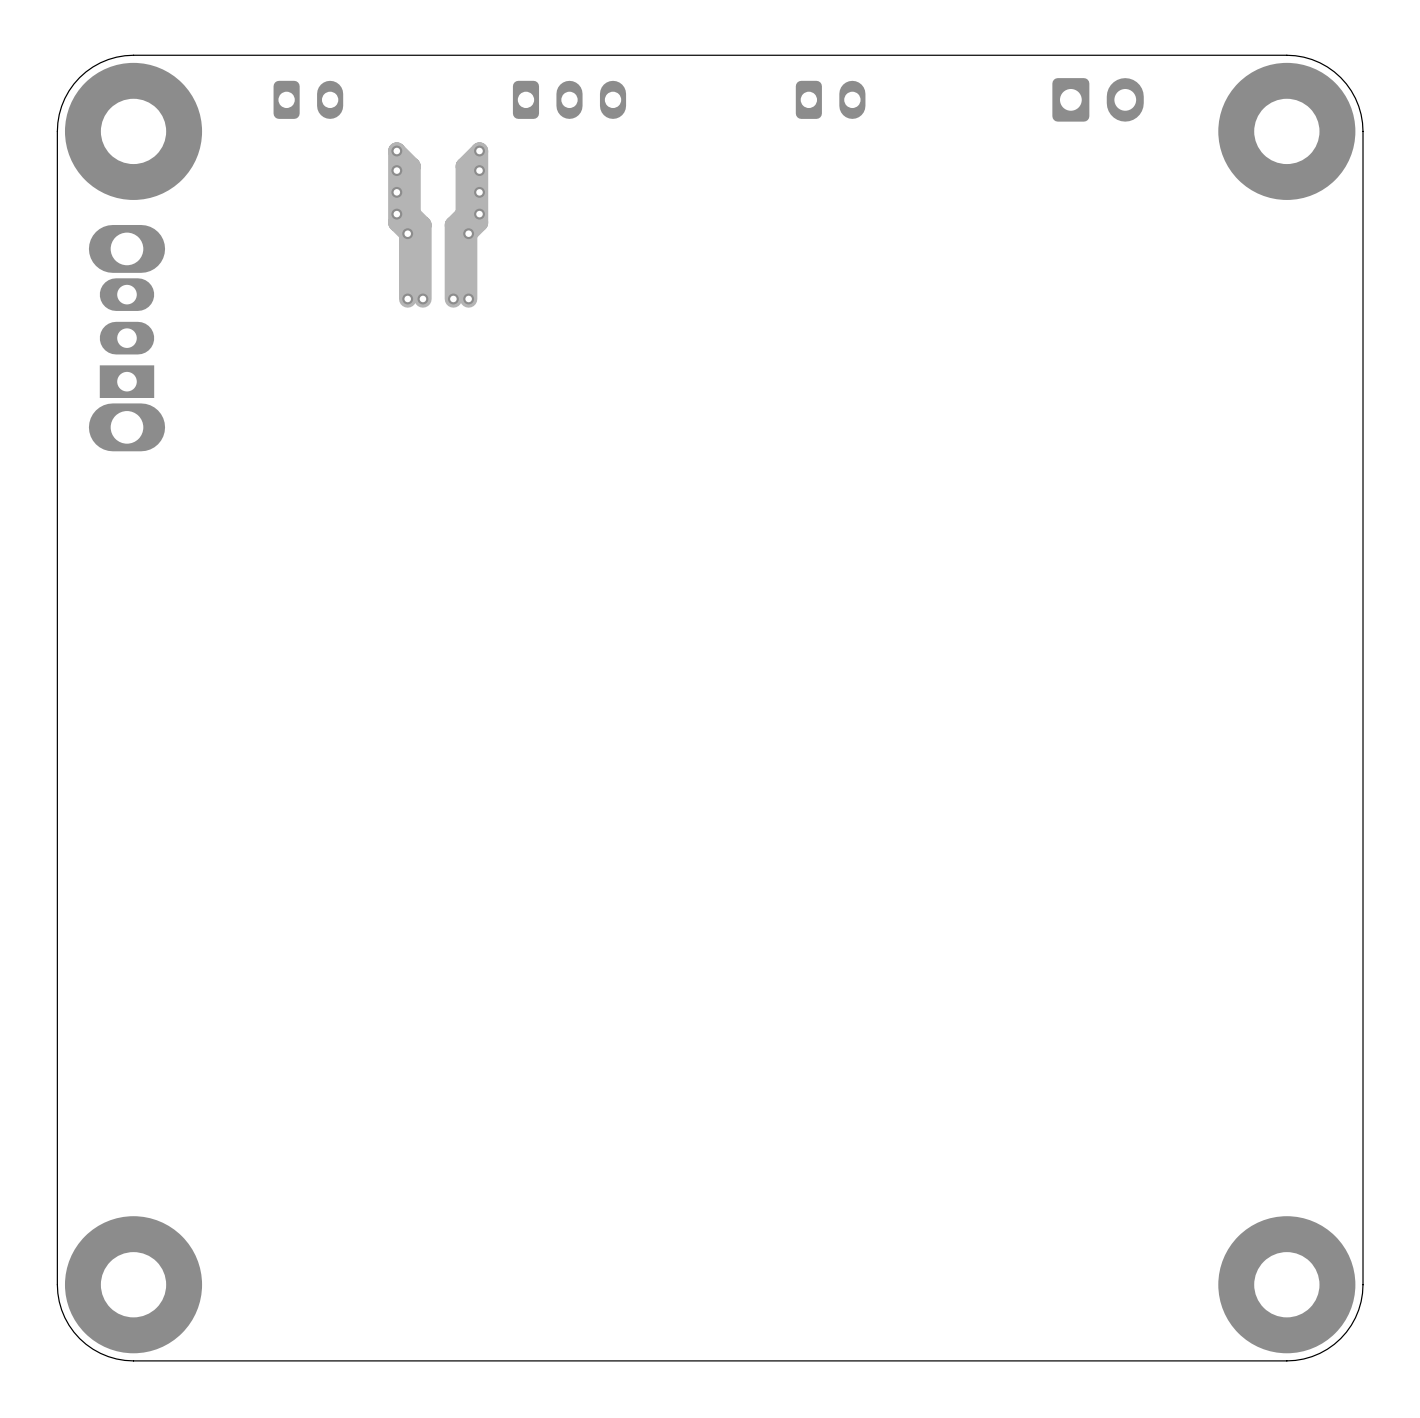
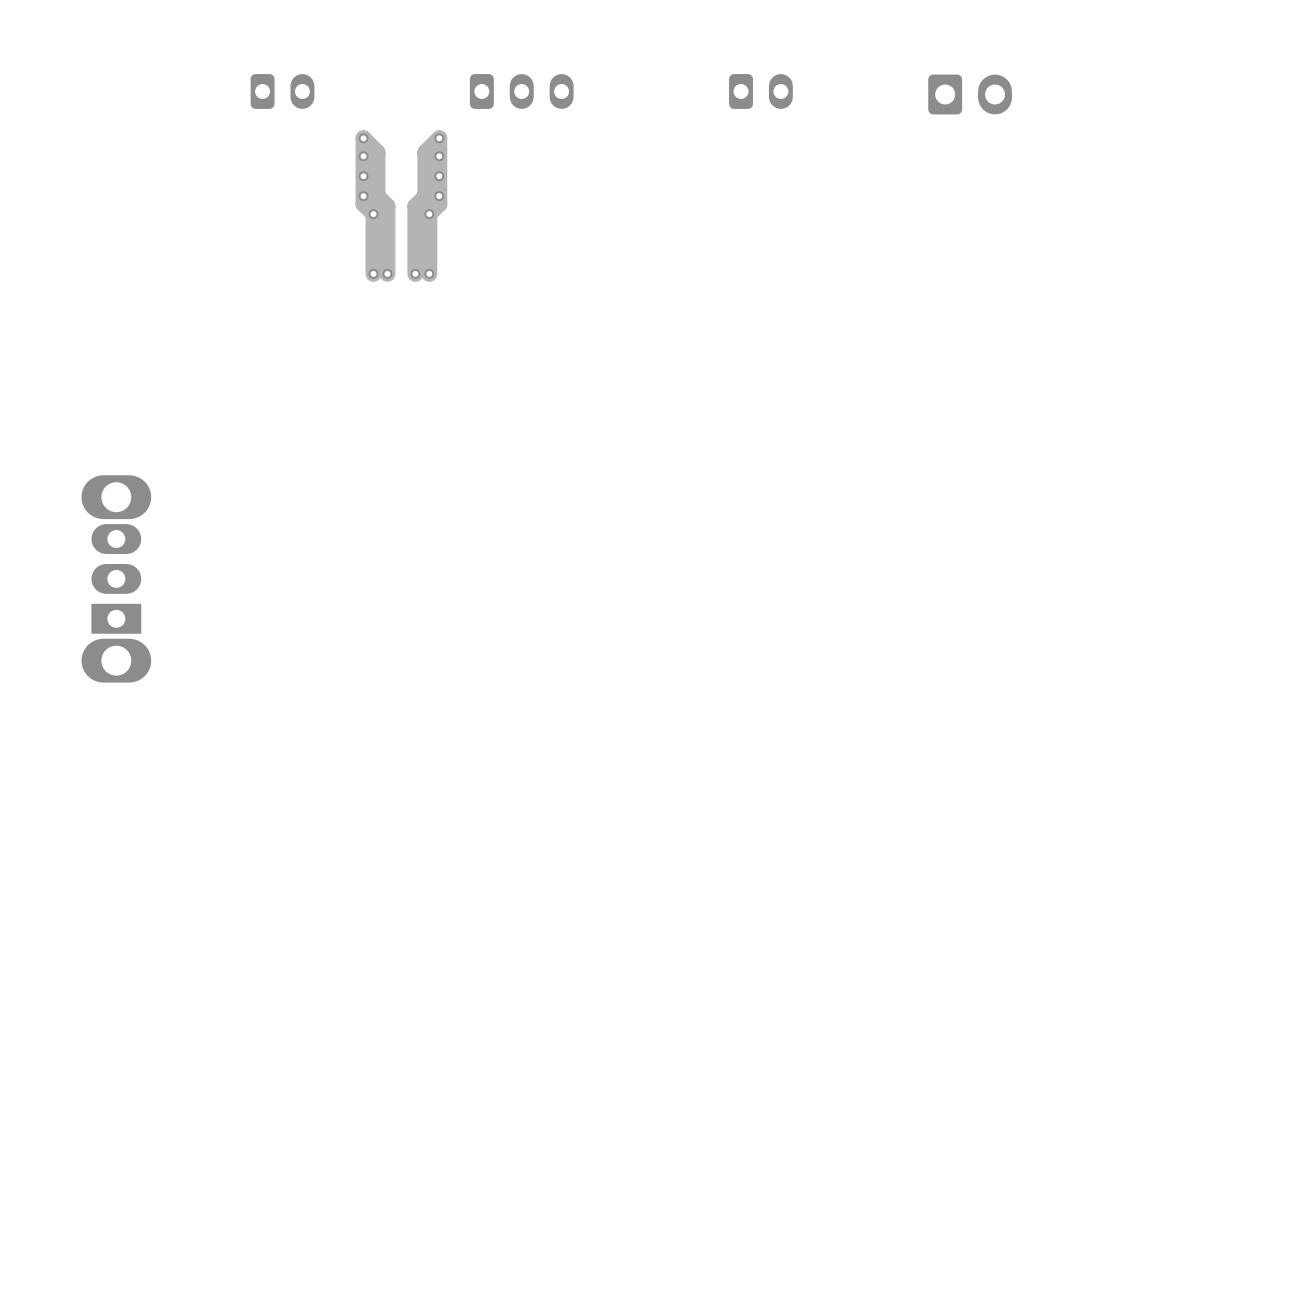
part position: (1098, 99) -> (970, 94)
part position: (126, 338) -> (116, 578)
part: (710, 708) -> none

